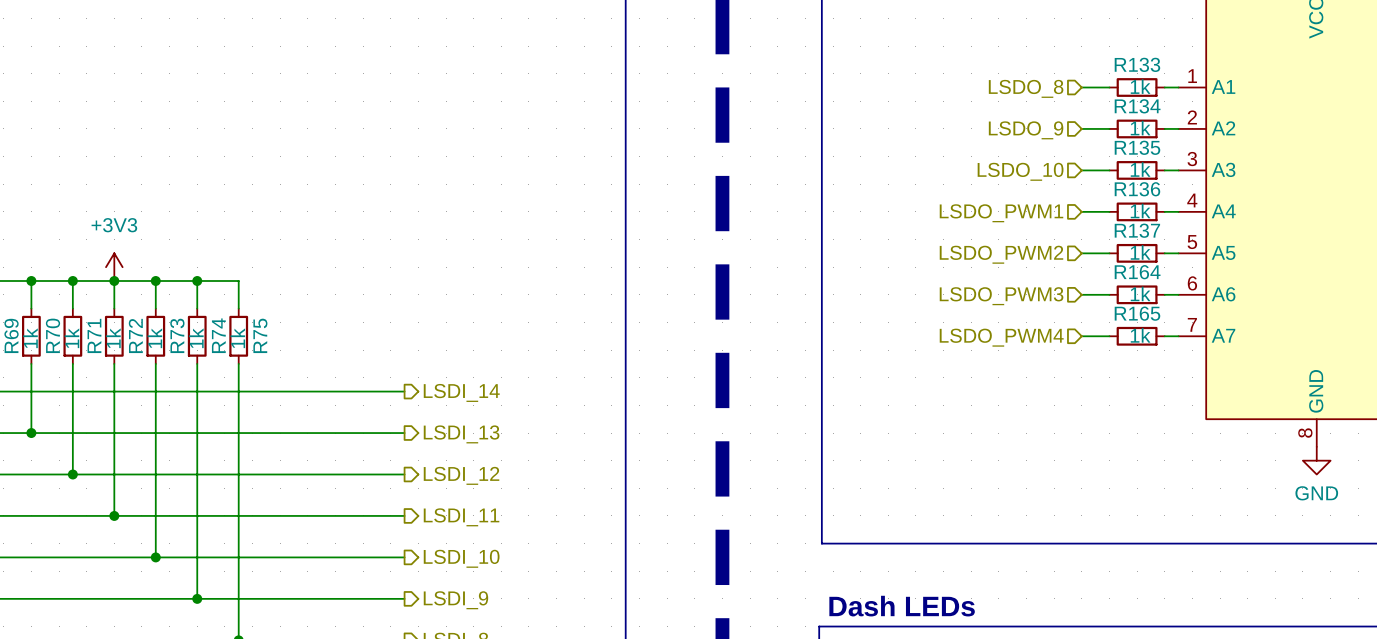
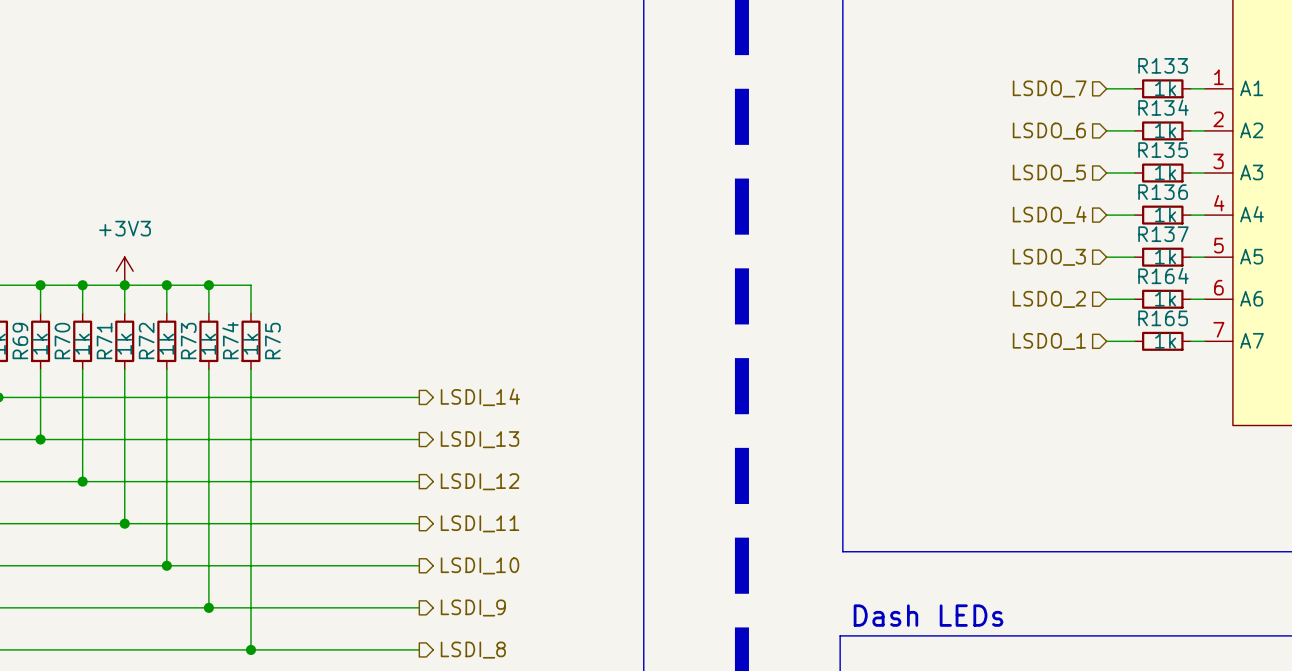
hierarchical label: LSDO_8 (1026, 88) -> LSDO_7 (1049, 88)
hierarchical label: LSDO_9 (1026, 130) -> LSDO_6 (1049, 131)
hierarchical label: LSDO_10 (1020, 171) -> LSDO_5 (1049, 173)
hierarchical label: LSDO_PWM1 (1001, 213) -> LSDO_4 (1049, 214)
hierarchical label: LSDO_PWM2 (1001, 254) -> LSDO_3 (1049, 257)
hierarchical label: LSDO_PWM3 (1001, 296) -> LSDO_2 (1049, 299)
hierarchical label: LSDO_PWM4 (1001, 337) -> LSDO_1 (1049, 341)

